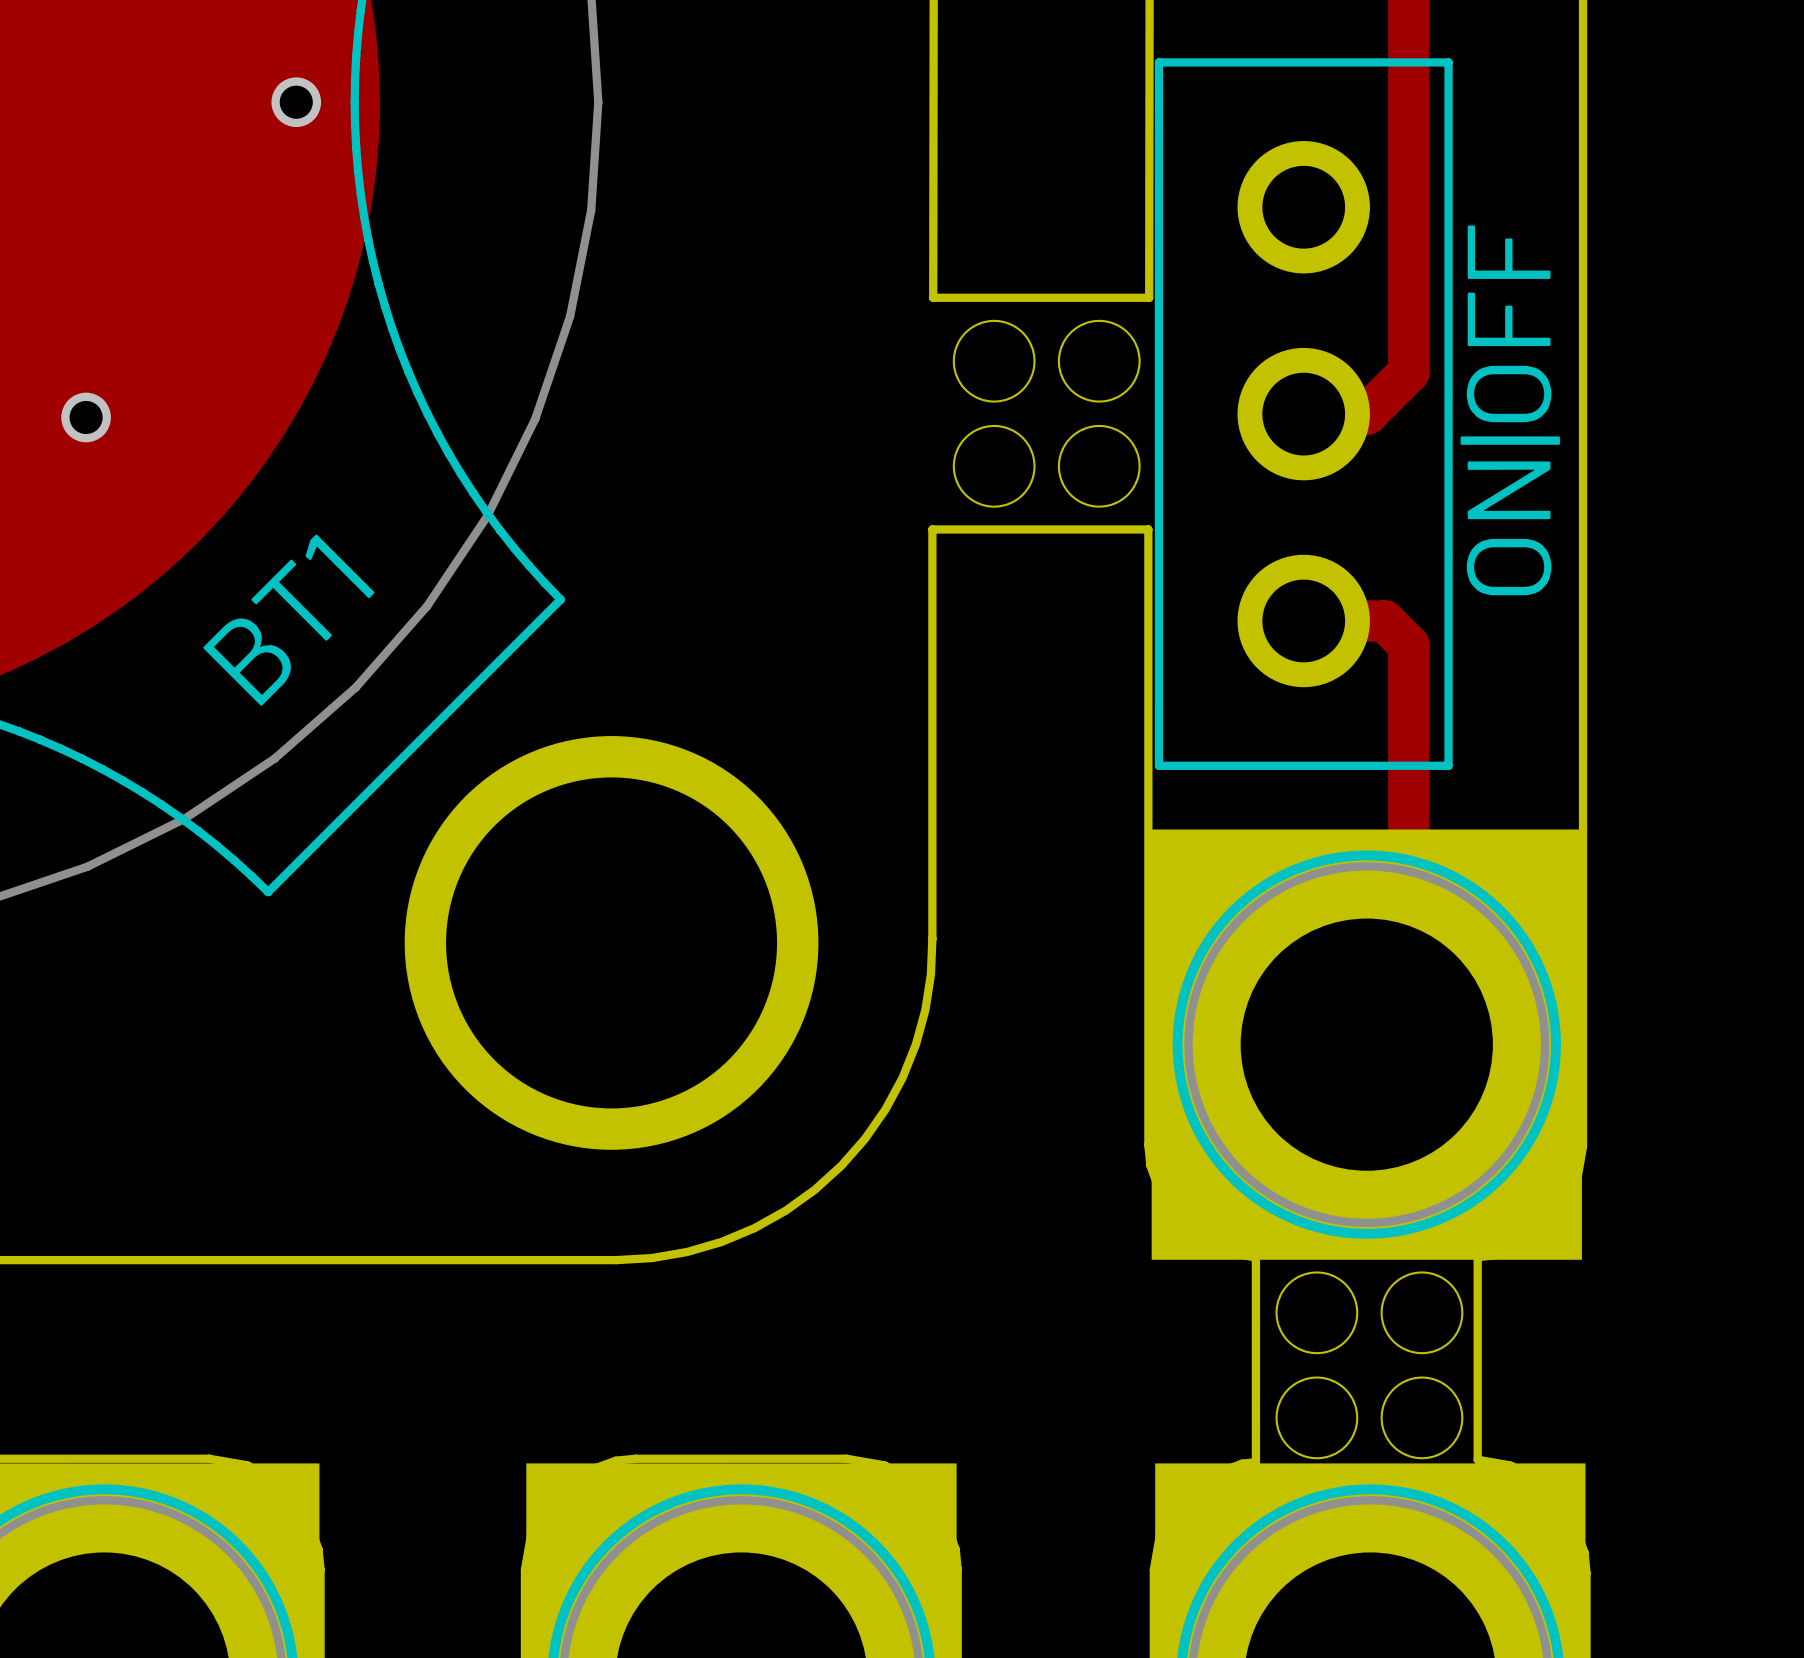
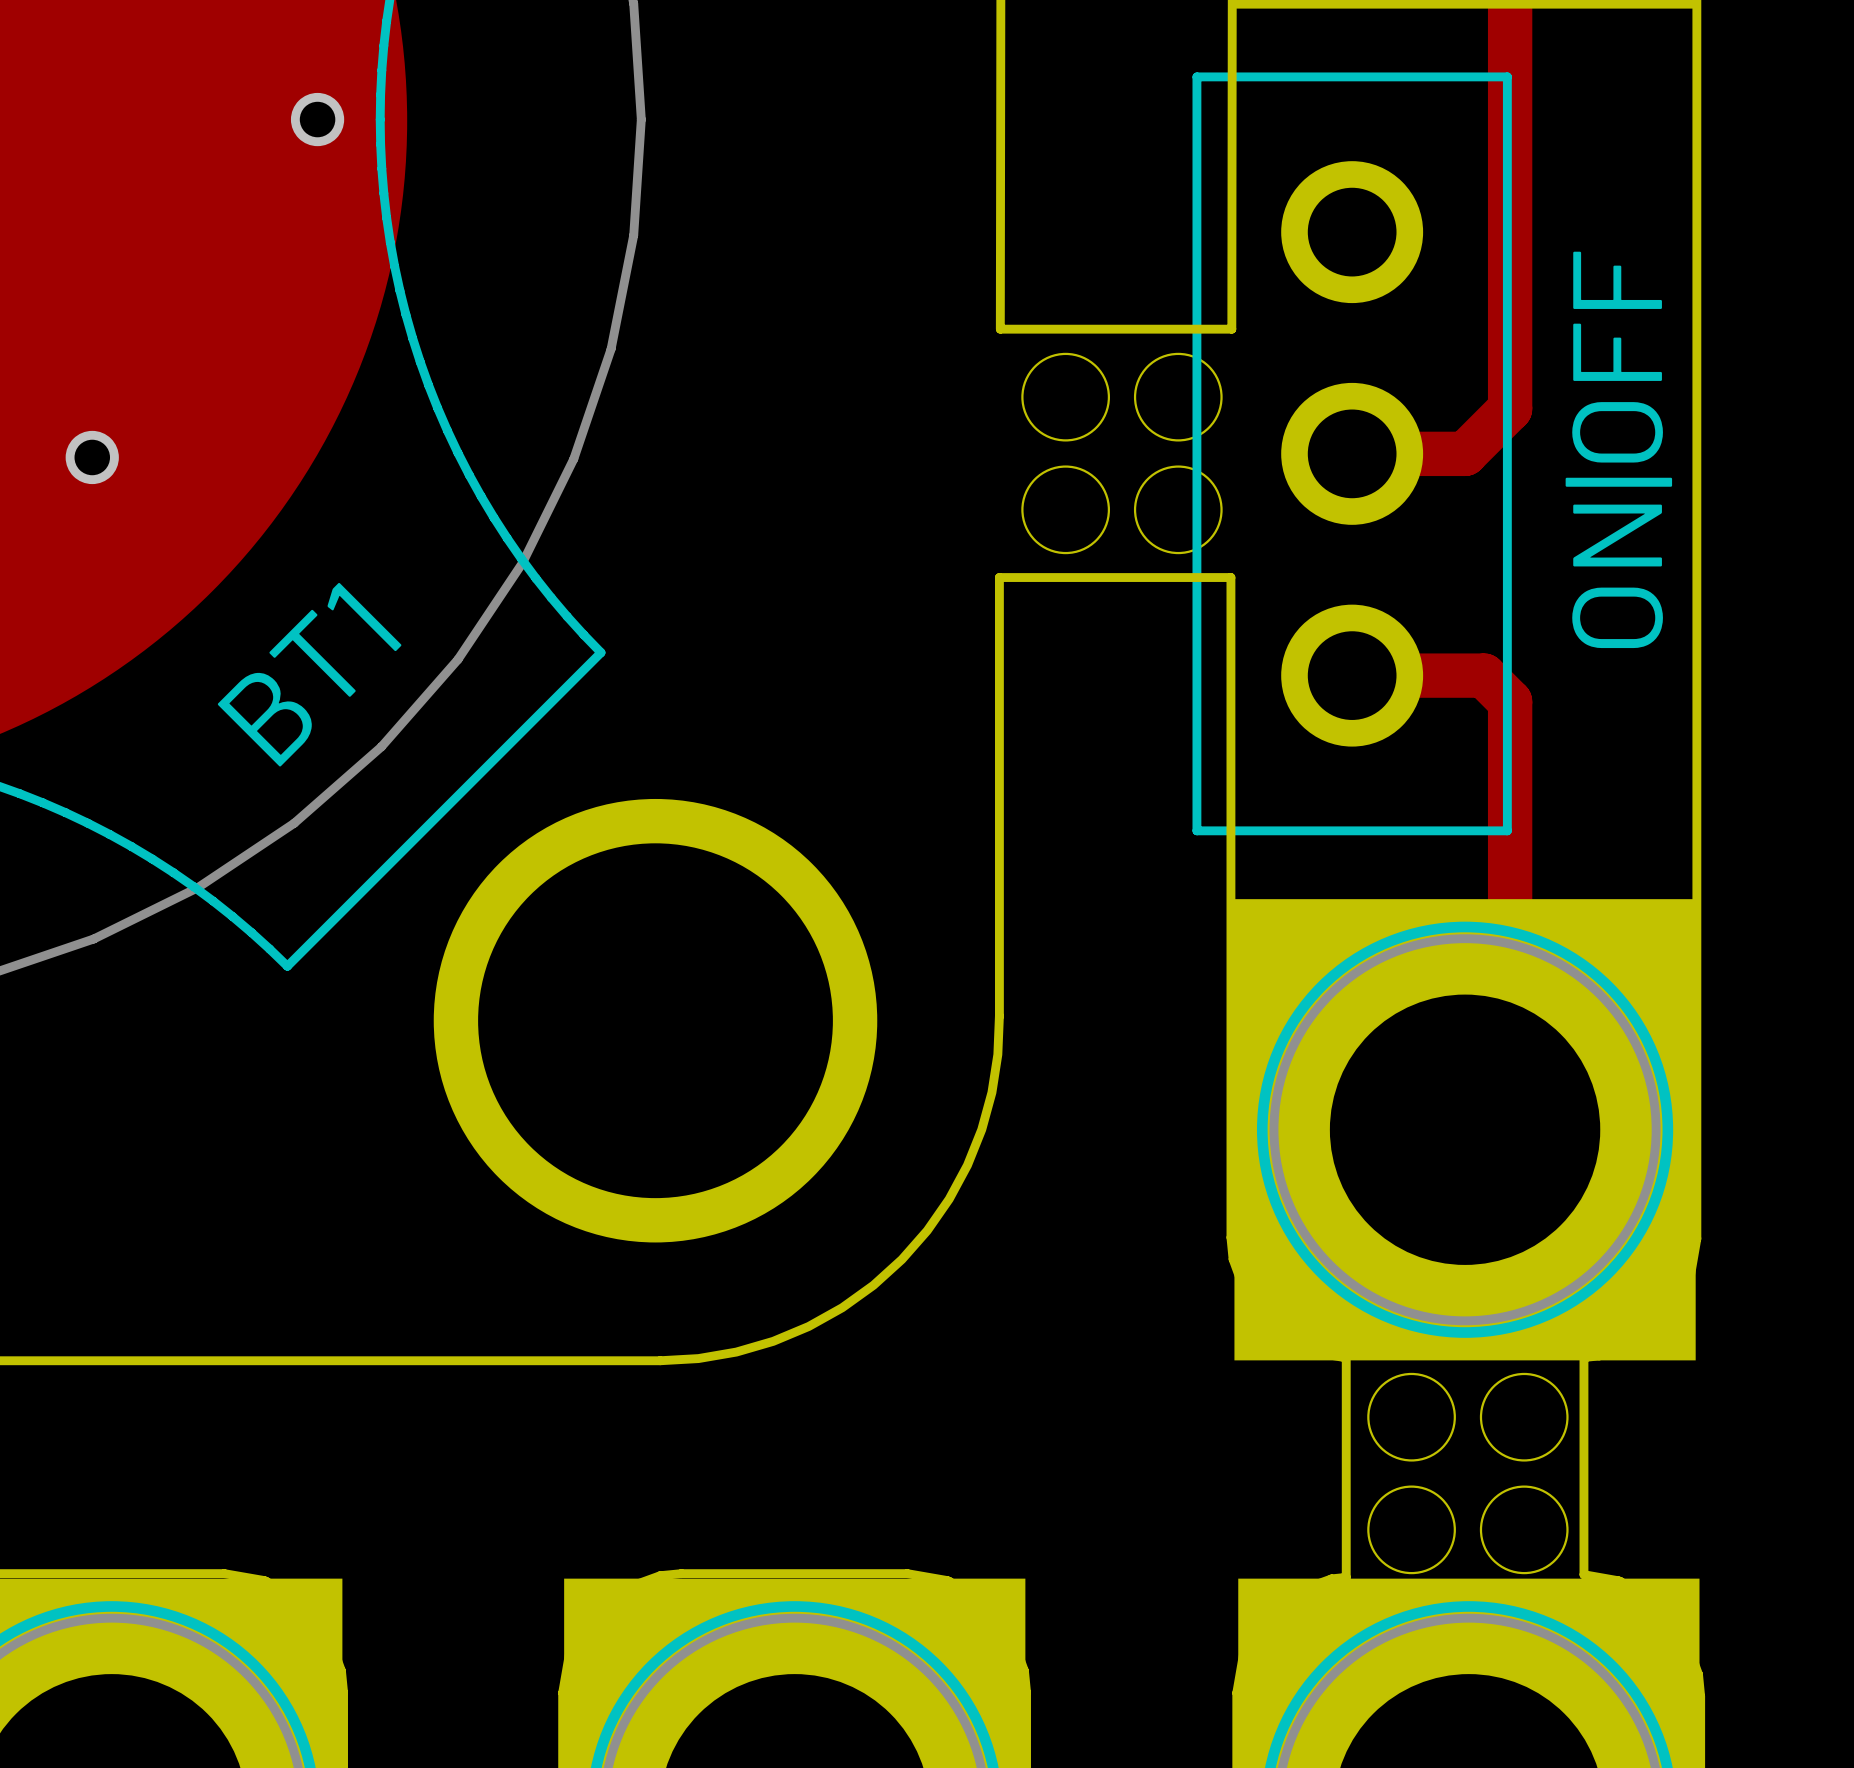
part position: (1303, 414) -> (1352, 453)

